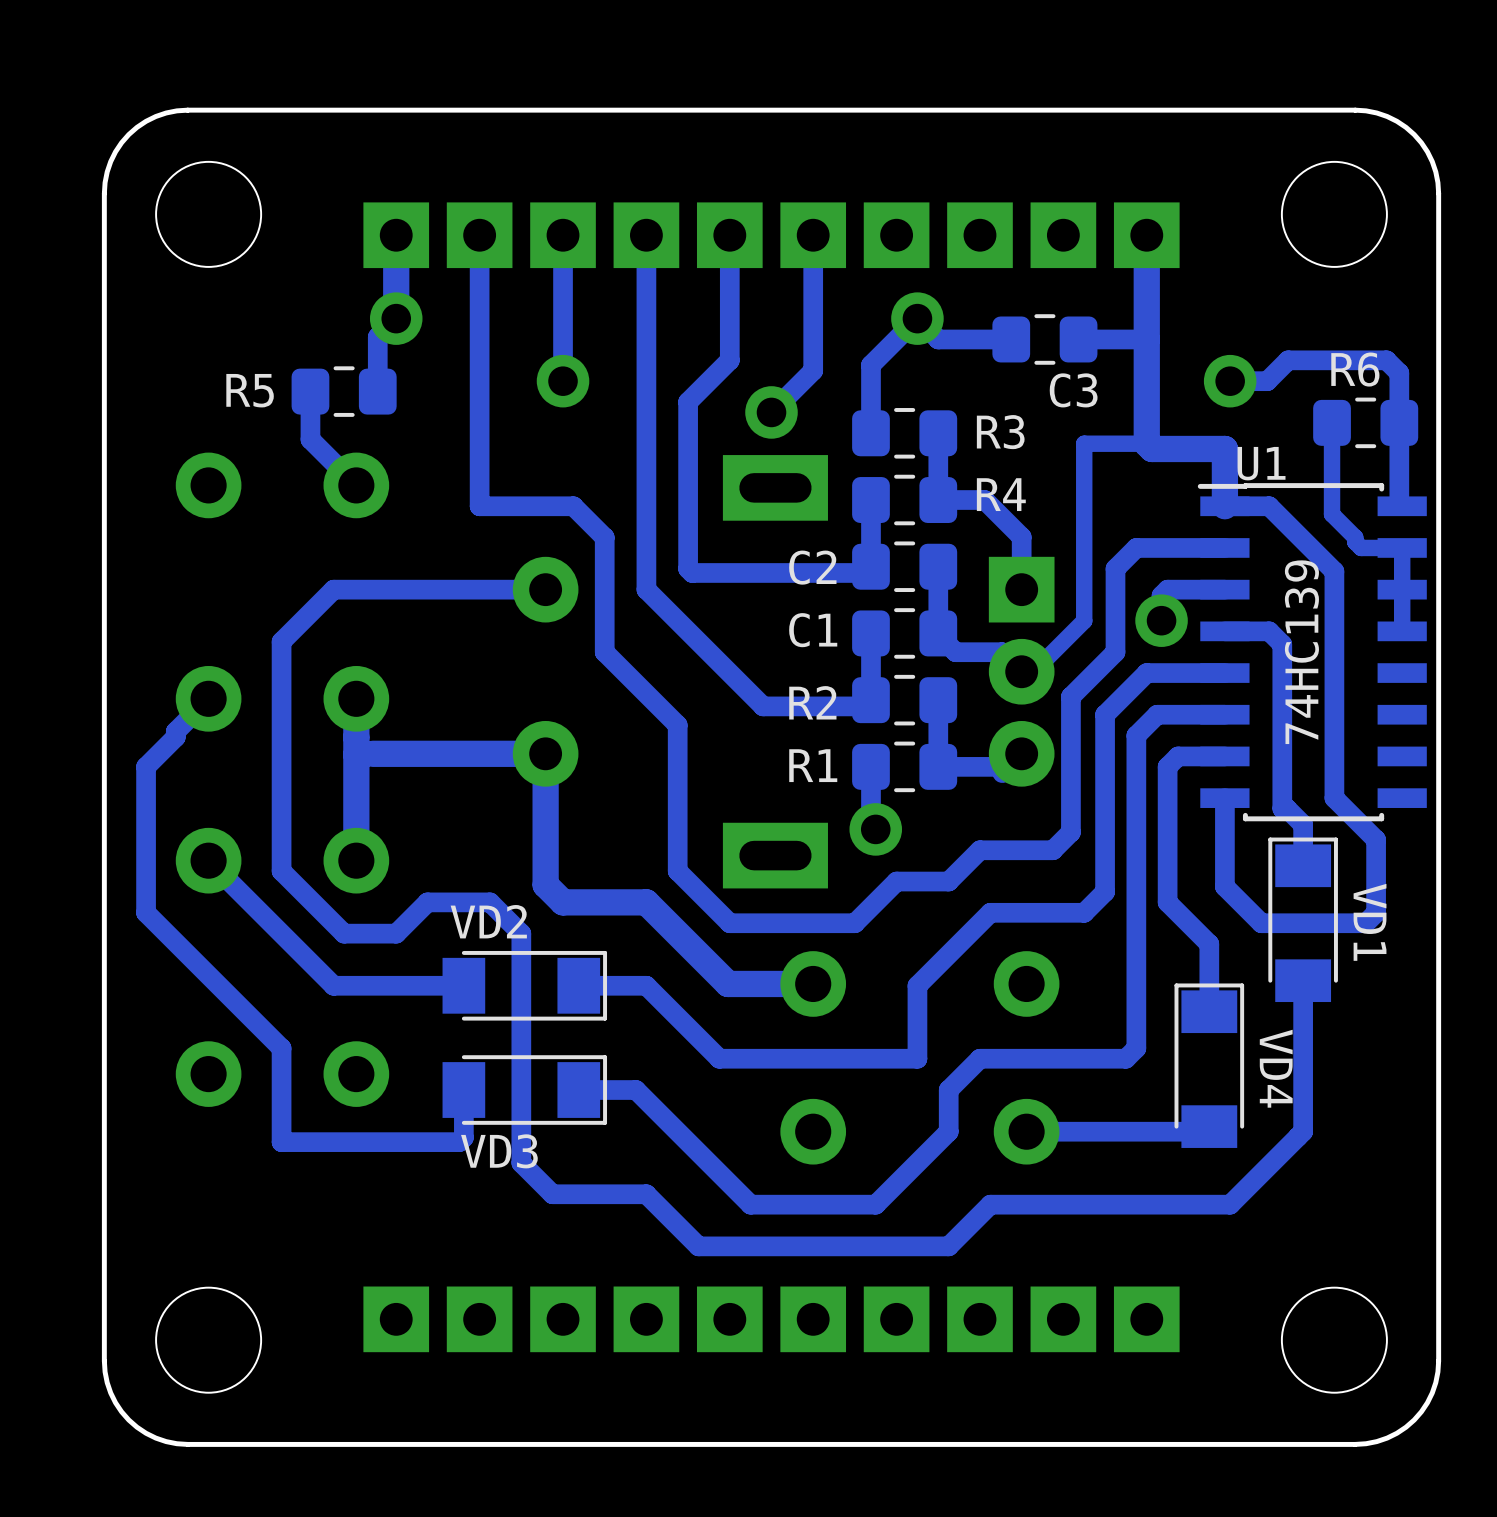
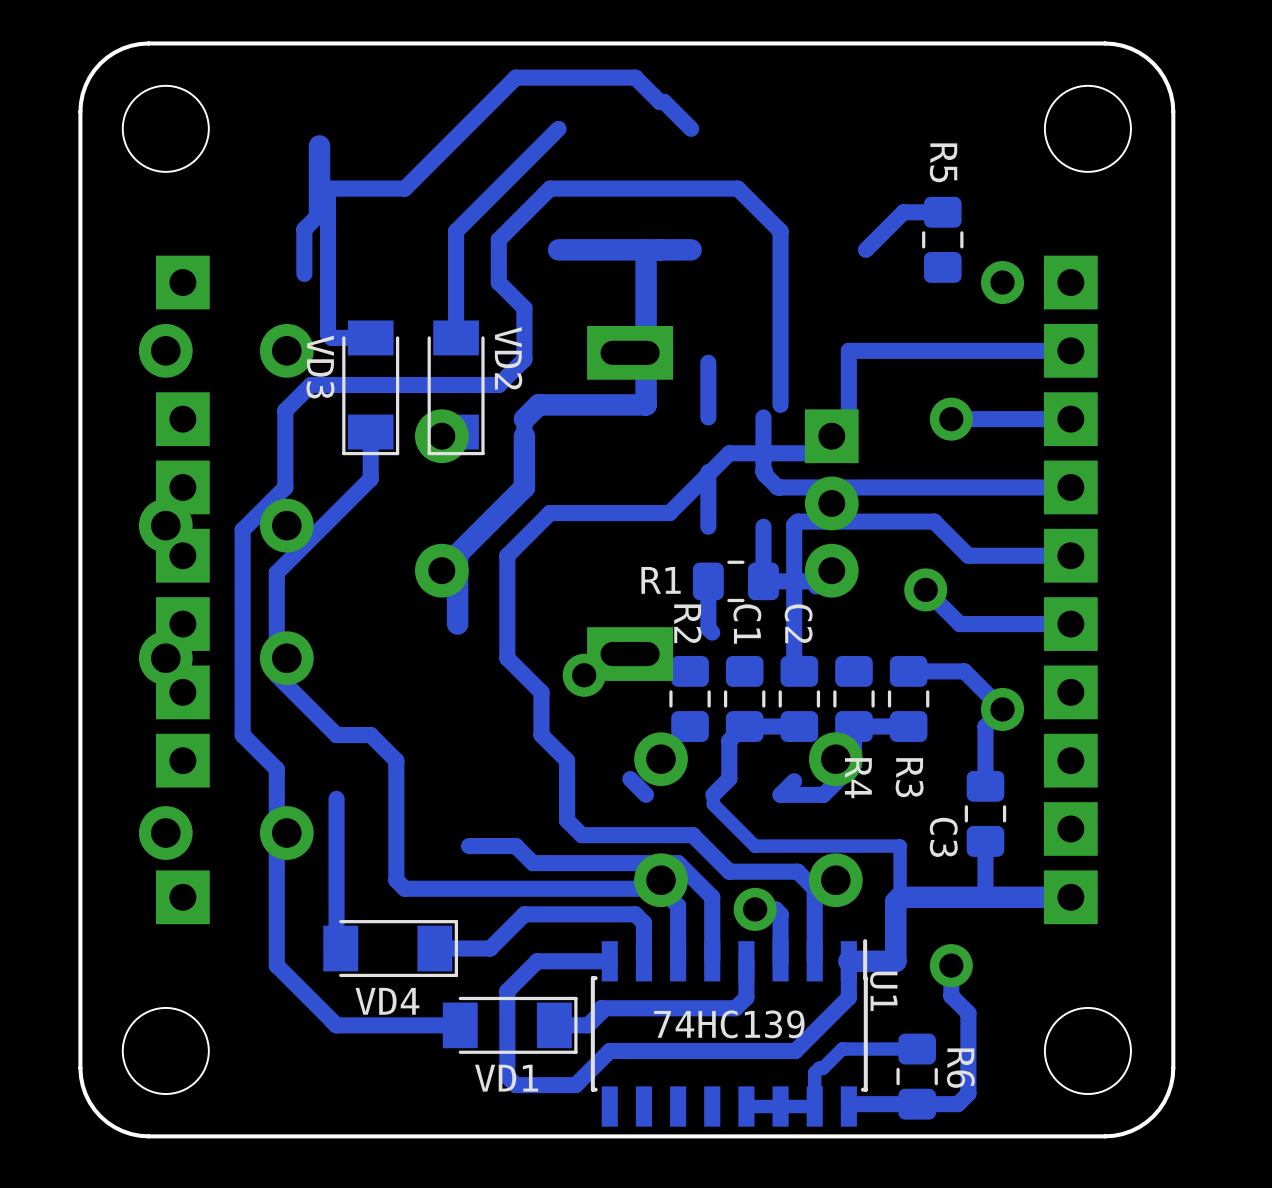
track: none -> (691, 128) (664, 101) (659, 101) (635, 77) (515, 77) (404, 188) (328, 188) (328, 334) (331, 337) (370, 337)
part: (396, 235) -> none
track: (479, 235) (479, 506) (573, 506) (604, 537) (604, 652) (677, 725) (677, 871) (729, 923) (854, 923) (896, 881) (948, 881) (979, 850) (1052, 850) (1070, 832) (1070, 696) (1115, 652) (1115, 568) (1136, 547) (1224, 547) -> none
part: (479, 235) -> none
track: (563, 235) (563, 339) -> (558, 128) (456, 231)
part: (563, 235) -> none
track: (646, 235) (646, 433) -> (780, 404) (780, 231) (737, 188) (550, 188) (498, 239) (498, 282) (524, 308)
part: (646, 235) -> none
track: (729, 235) (729, 360) (688, 402) (688, 568) (692, 572) (870, 572) -> none
part: (729, 235) -> none
track: (813, 235) (813, 370) (771, 412) -> none
part: (813, 235) -> none
part: (896, 235) -> none
part: (979, 235) -> none
part: (1063, 235) -> none
track: (1146, 235) (1146, 443) -> none
part: (1146, 235) -> none
track: none -> (942, 212) (903, 212) (865, 249)
via: (396, 318) -> none
via: (917, 318) -> none
track: (1011, 339) (938, 339) (917, 318) (870, 365) (870, 433) -> none
C3 rotation: 0° (1044, 339) -> 90° clockwise (985, 813)
C3 position: (1044, 339) -> (985, 813)
track: (1146, 339) (1078, 339) -> none
track: none -> (691, 249) (558, 249)
track: none -> (456, 265) (456, 337)
via: (563, 381) -> none
track: (1230, 381) (1267, 381) (1288, 360) (1386, 360) (1399, 373) (1399, 503) (1402, 506) -> none
via position: (1230, 381) -> (1002, 282)
track: (310, 391) (310, 439) (356, 485) -> none
R5 rotation: 0° (344, 391) -> 90° clockwise (942, 239)
R5 position: (344, 391) -> (942, 239)
part: none -> (182, 282)
part: none -> (1070, 282)
via: (771, 412) -> none
track: (1332, 422) (1332, 514) (1355, 537) (1355, 542) (1361, 547) (1402, 547) (1402, 631) -> none
R6 rotation: 0° (1365, 422) -> 90° clockwise (917, 1076)
R6 position: (1365, 422) -> (917, 1076)
R3 rotation: 0° (904, 433) -> 90° clockwise (908, 698)
R3 position: (904, 433) -> (908, 698)
track: (938, 433) (938, 500) (984, 500) (1021, 537) (1021, 589) (1005, 572) -> none
track: (1146, 443) (1084, 443) (1084, 620) (1033, 671) (1021, 671) (1002, 652) -> (1070, 487) (815, 487)
track: (1146, 443) (1152, 448) (1224, 448) (1224, 506) (1269, 506) (1334, 571) (1334, 798) (1376, 839) (1376, 912) (1365, 923) (1261, 923) (1224, 886) (1224, 798) -> none
track: none -> (1070, 350) (848, 350) (848, 427) (823, 453) (729, 453) (669, 513) (550, 513) (507, 555) (507, 658) (541, 692) (541, 735) (567, 760) (567, 820) (581, 835) (692, 835) (729, 871) (797, 871) (814, 888) (814, 961)
part: none -> (1070, 350)
track: (646, 495) (646, 568) -> (645, 249) (646, 404) (538, 404) (524, 419)
R4 rotation: 0° (904, 500) -> 90° clockwise (853, 698)
R4 position: (904, 500) -> (853, 698)
C2 rotation: 0° (904, 566) -> 90° clockwise (799, 698)
C2 position: (904, 566) -> (799, 698)
part: none -> (182, 419)
track: none -> (1070, 419) (951, 419)
part: none -> (1070, 419)
track: none -> (370, 432) (370, 478) (276, 572) (276, 675) (336, 735) (370, 735) (396, 760) (396, 880) (404, 888) (661, 888) (678, 905) (678, 961)
track: (545, 589) (333, 589) (281, 641) (281, 871) (344, 933) (396, 933) (427, 902) (490, 902) (521, 933) (521, 1162) (552, 1194) (646, 1194) (698, 1246) (948, 1246) (990, 1204) (1230, 1204) (1303, 1131) (1303, 980) -> none
track: (646, 589) (763, 706) (870, 706) -> (524, 436) (524, 487) (457, 554) (457, 624)
track: (1224, 589) (1167, 589) (1161, 595) (1161, 620) -> none
via position: (1161, 620) -> (951, 419)
track: (1224, 631) (1269, 631) (1282, 644) (1282, 808) (1286, 808) (1303, 824) (1303, 865) -> none
C1 rotation: 0° (904, 633) -> 90° clockwise (744, 698)
C1 position: (904, 633) -> (744, 698)
part: none -> (182, 487)
text rotation: 0° (1301, 652) -> 90° clockwise (729, 1024)
text position: 74HC139 (1301, 652) -> 74HC139 (729, 1024)
U1 rotation: 0° (1312, 652) -> 90° clockwise (729, 1032)
U1 position: (1312, 652) -> (729, 1032)
part: none -> (1070, 487)
track: (1224, 673) (1146, 673) (1105, 714) (1105, 891) (1084, 912) (990, 912) (917, 985) (917, 1058) (719, 1058) (646, 985) (578, 985) -> none
track: (208, 698) (175, 731) (175, 737) (146, 766) (146, 912) (281, 1048) (281, 1142) (459, 1142) (463, 1137) (463, 1090) -> none
track: (356, 698) (356, 860) -> none
R2 rotation: 0° (904, 700) -> 90° clockwise (690, 698)
R2 position: (904, 700) -> (690, 698)
track: (1224, 714) (1157, 714) (1136, 735) (1136, 1048) (1125, 1058) (979, 1058) (948, 1090) (948, 1131) (875, 1204) (750, 1204) (656, 1110) -> (712, 961) (712, 897) (678, 863) (532, 863)
part: none -> (182, 555)
track: none -> (1070, 555) (968, 555) (934, 521) (797, 521) (794, 525) (794, 671)
part: none -> (1070, 555)
track: (356, 754) (545, 753) (545, 884) (563, 902) (646, 902) (728, 983) (813, 983) -> none
track: (1224, 756) (1178, 756) (1167, 766) (1167, 902) (1209, 944) -> (908, 671) (964, 671) (1002, 709) (985, 726)
track: none -> (925, 589) (959, 624) (1070, 624)
via: none -> (925, 589)
part: none -> (182, 624)
part: none -> (1070, 624)
via: (875, 829) -> none
track: (208, 860) (302, 954) -> (524, 359) (498, 385) (310, 385) (285, 410) (285, 487) (242, 530) (242, 735)
via: none -> (584, 675)
part: none -> (182, 692)
part: none -> (1070, 692)
VD1 rotation: 0° (1303, 919) -> 90° clockwise (510, 1025)
VD1 position: (1303, 919) -> (510, 1025)
via: none -> (1002, 709)
track: none -> (799, 726) (744, 726) (741, 728) (729, 740) (729, 778) (713, 794) (713, 804) (754, 846) (900, 846) (900, 897)
track: none -> (908, 726) (853, 726) (853, 764) (823, 794) (780, 794) (794, 781)
part: none -> (182, 760)
track: (463, 985) (333, 985) -> (460, 1025) (336, 1025) (276, 965) (276, 769) (268, 760)
VD2 rotation: 0° (524, 985) -> 90° clockwise (456, 387)
VD2 position: (524, 985) -> (456, 387)
part: none -> (1070, 760)
track: none -> (630, 779) (646, 794)
track: none -> (336, 798) (336, 944) (340, 948)
VD4 rotation: 0° (1209, 1065) -> 90° clockwise (390, 948)
VD4 position: (1209, 1065) -> (390, 948)
part: none -> (1070, 828)
track: none -> (985, 841) (985, 897)
VD3 rotation: 0° (524, 1090) -> 90° clockwise (370, 387)
VD3 position: (524, 1090) -> (370, 387)
track: (1209, 1126) (1204, 1131) (1026, 1131) -> none
part: none -> (182, 897)
track: none -> (900, 897) (895, 901) (895, 961) (848, 961) (848, 997) (795, 1050) (609, 1050) (575, 1085) (515, 1085) (507, 1076) (507, 991) (537, 961) (609, 961)
track: none -> (1070, 897) (900, 897)
part: none -> (1070, 897)
track: none -> (755, 909) (775, 909) (780, 914) (780, 961)
via: none -> (755, 909)
track: none -> (434, 948) (490, 948) (524, 914) (635, 914) (643, 922) (643, 961)
track: none -> (746, 961) (746, 997) (735, 1008) (601, 1008) (601, 1012) (588, 1025) (554, 1025)
track: none -> (951, 965) (951, 996) (968, 1013) (968, 1093) (957, 1104) (851, 1104) (848, 1106)
via: none -> (951, 965)
part: (396, 1319) -> none
part: (479, 1319) -> none
part: (563, 1319) -> none
part: (646, 1319) -> none
part: (729, 1319) -> none
part: (813, 1319) -> none
part: (896, 1319) -> none
part: (979, 1319) -> none
part: (1063, 1319) -> none
part: (1146, 1319) -> none
track: none -> (917, 1049) (842, 1049) (823, 1068) (819, 1068) (814, 1072) (814, 1106) (746, 1106)

